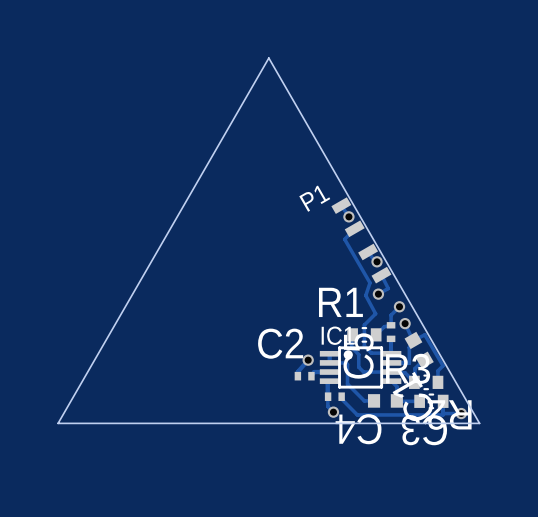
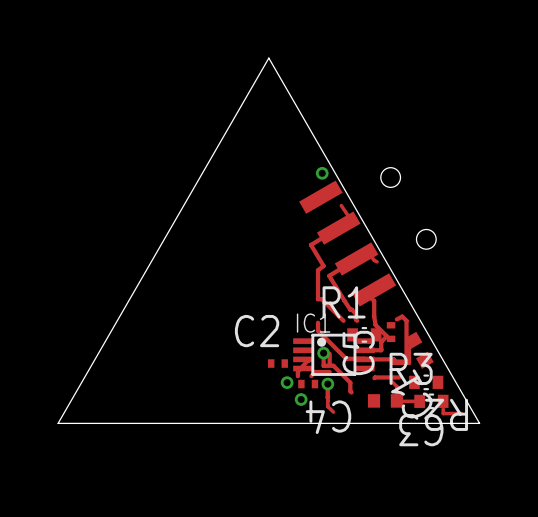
via: none -> (322, 173)
via: (348, 216) -> none
track: none -> (338, 228) (310, 244) (323, 266) (318, 270) (318, 299) (321, 299) (343, 320)
track: (354, 228) (344, 239) (370, 282) (365, 295) (375, 313) (364, 325) (364, 346) (371, 353) (391, 353) (391, 338) -> none
part: none -> (367, 237)
P1: (361, 240) -> none
track: none -> (356, 259) (329, 275) (350, 309) (355, 313) (357, 320)
via: (377, 261) -> none
track: (381, 275) (388, 288) (378, 294) -> none
track: none -> (374, 289) (370, 294) (367, 294) (374, 301) (375, 325) (386, 336) (381, 341) (381, 350) (364, 350)
via: (378, 294) -> none
track: (399, 306) (391, 315) (391, 325) (384, 326) (376, 334) -> none
via: (399, 306) -> none
track: none -> (396, 319) (402, 316) (406, 320) (406, 361) (392, 362) (393, 359) (346, 358) (318, 330) (318, 322)
track: (405, 323) (413, 341) (409, 347) (413, 340) (424, 334) (443, 365) (437, 370) (437, 382) -> none
via: (405, 323) -> none
track: (352, 334) (351, 347) (358, 354) (358, 367) (363, 372) (405, 372) (414, 382) (414, 368) (424, 360) -> none
via: none -> (323, 353)
track: none -> (323, 357) (323, 365) (333, 365) (350, 382) (351, 392)
via: (308, 360) -> none
track: (329, 362) (346, 362) (347, 384) (364, 400) (374, 400) -> none
IC1 position: (360, 367) -> (333, 354)
C2 position: (304, 376) -> (277, 363)
track: none -> (399, 377) (374, 378)
via: none -> (287, 382)
via: none -> (327, 384)
C4 position: (334, 396) -> (308, 384)
track: (341, 396) (340, 397) (357, 414) (443, 414) (443, 401) -> none
via: none -> (301, 399)
via: (333, 412) -> none
via: (461, 413) -> none

